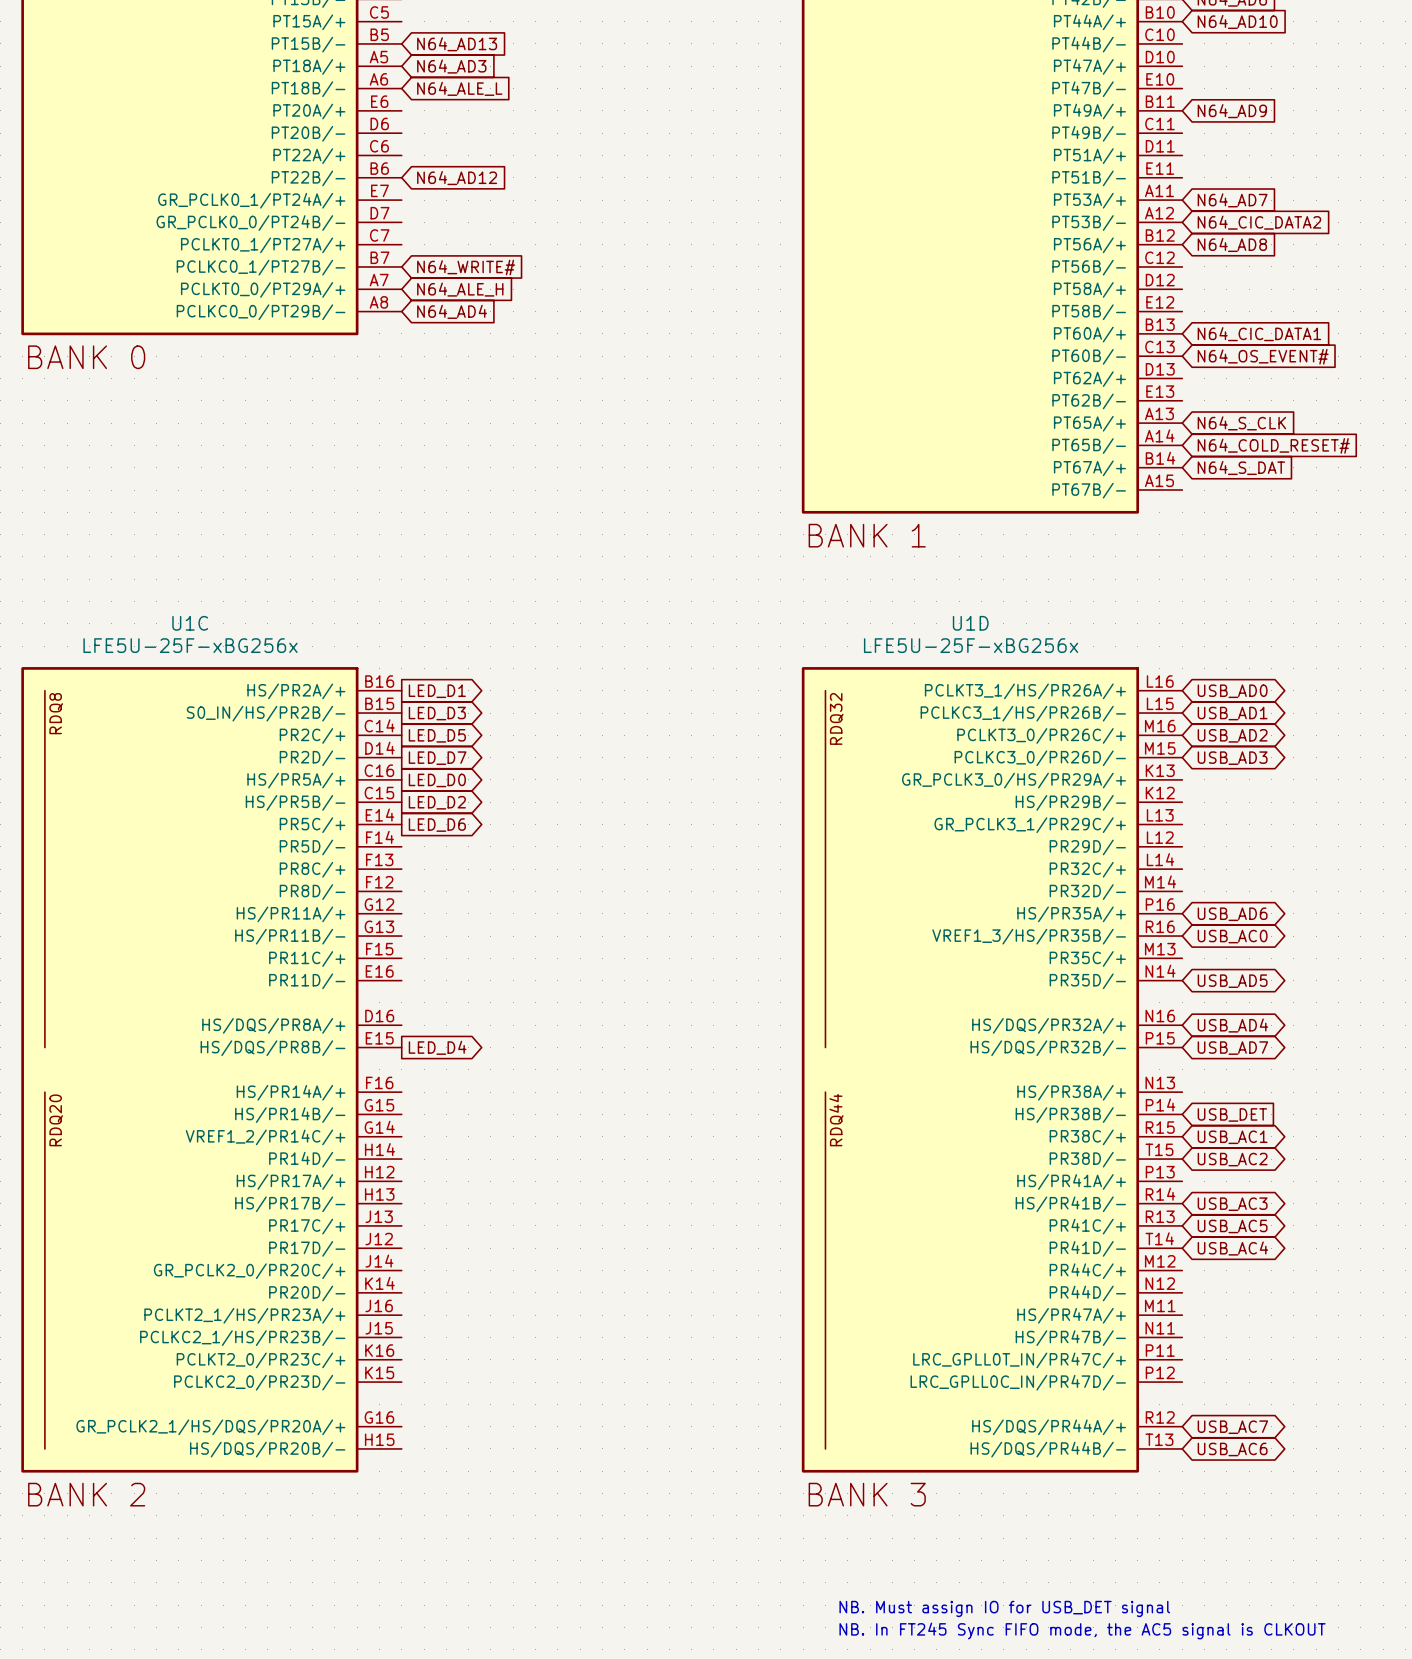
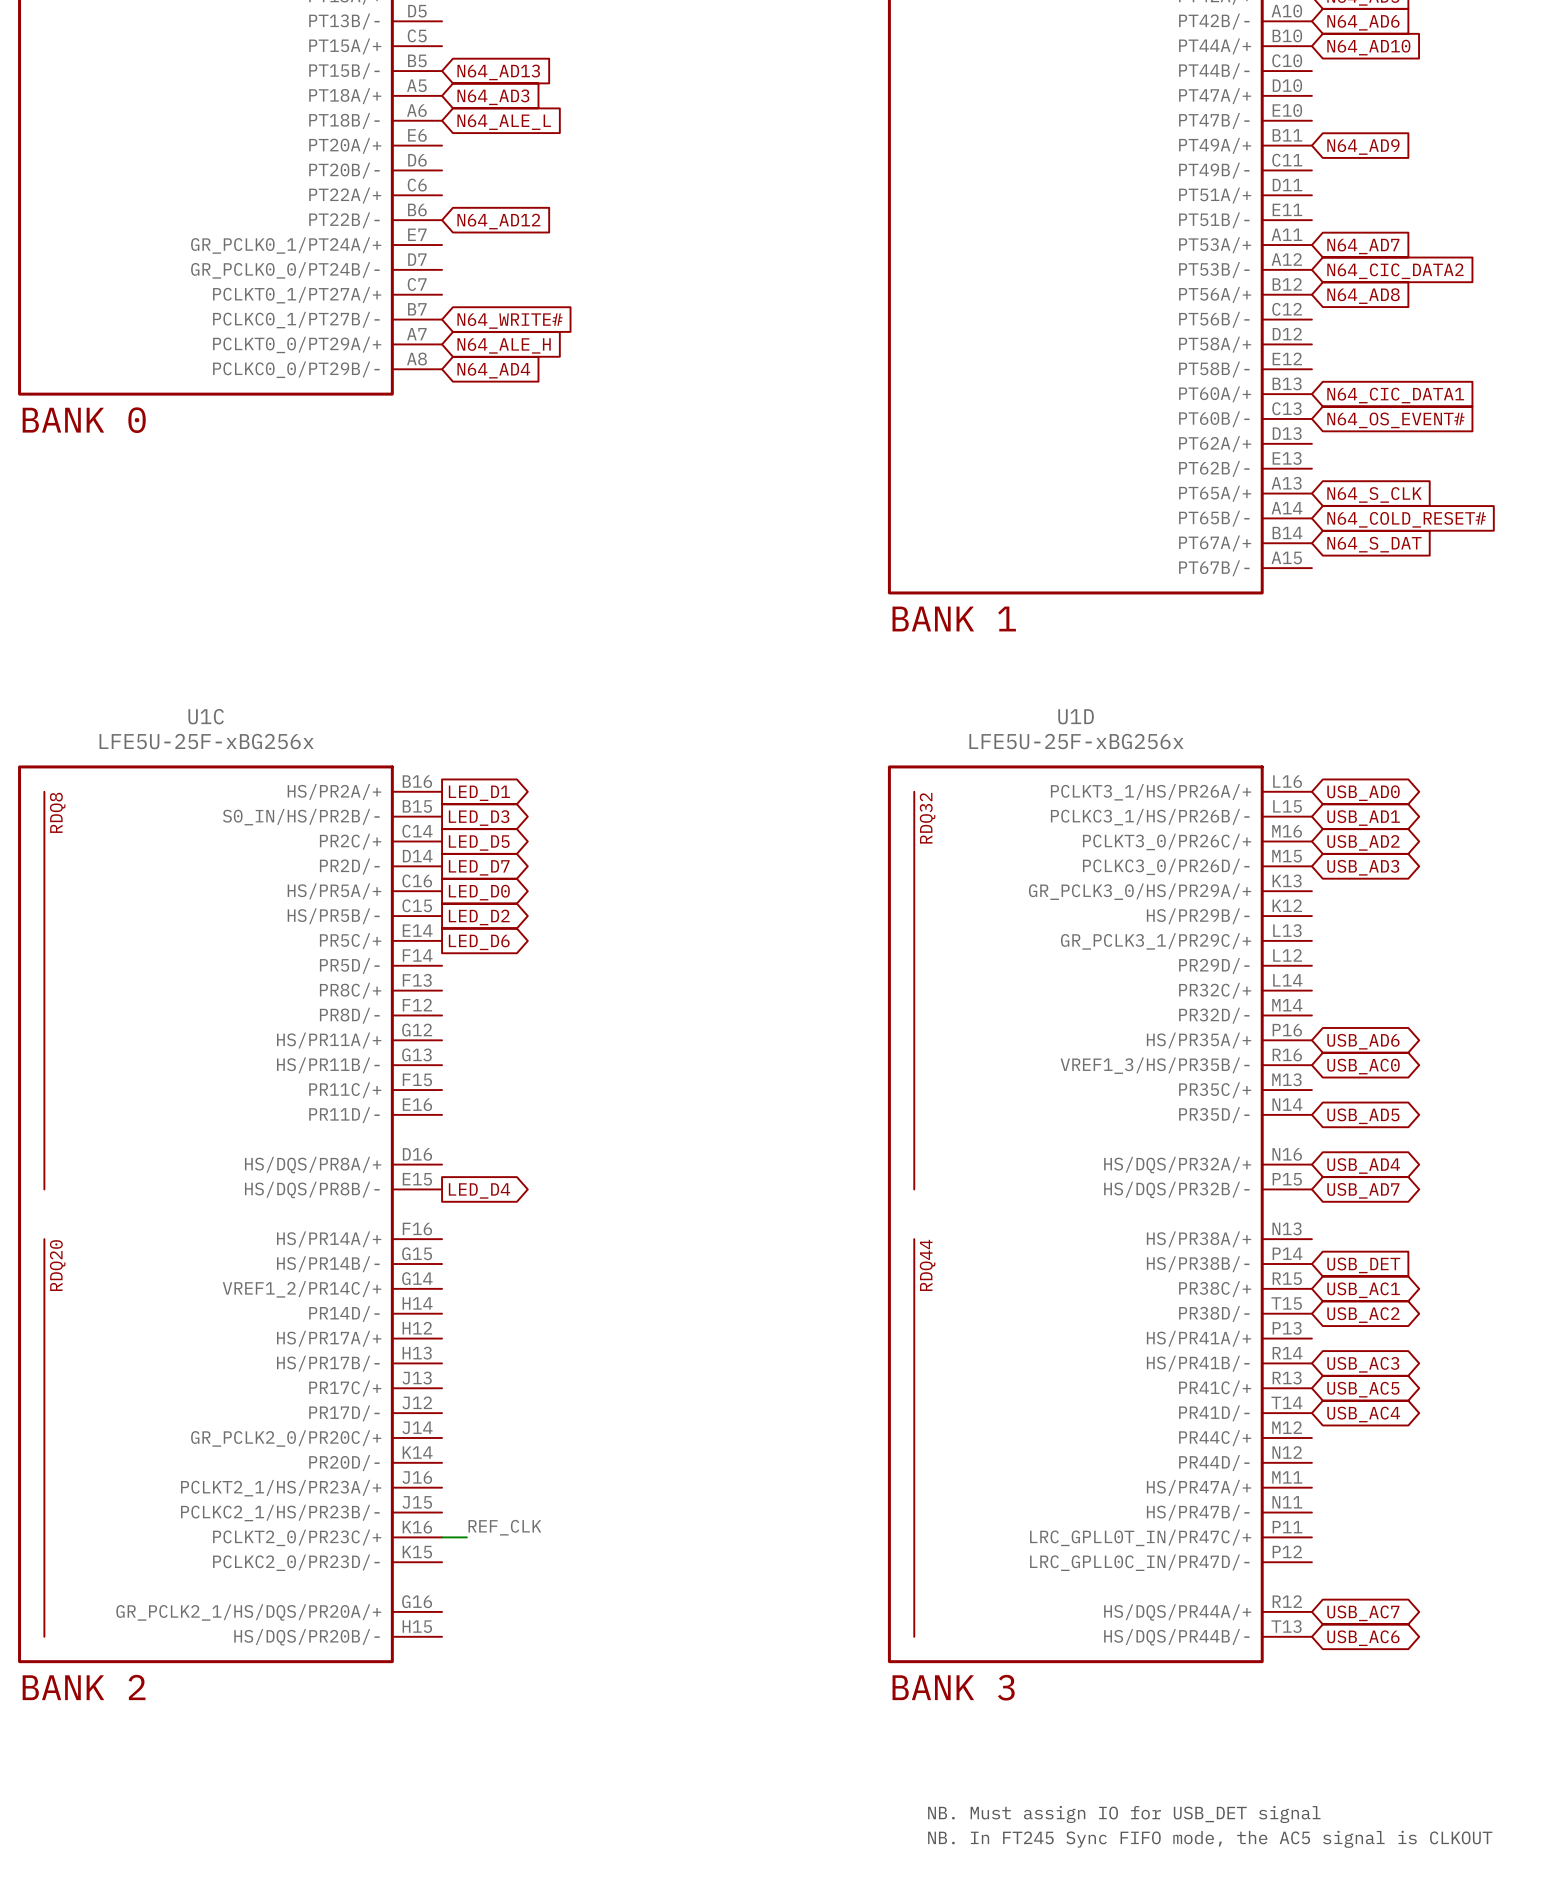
label: none -> REF_CLK (504, 1527)
wire: none -> (442, 1537) (466, 1537)

